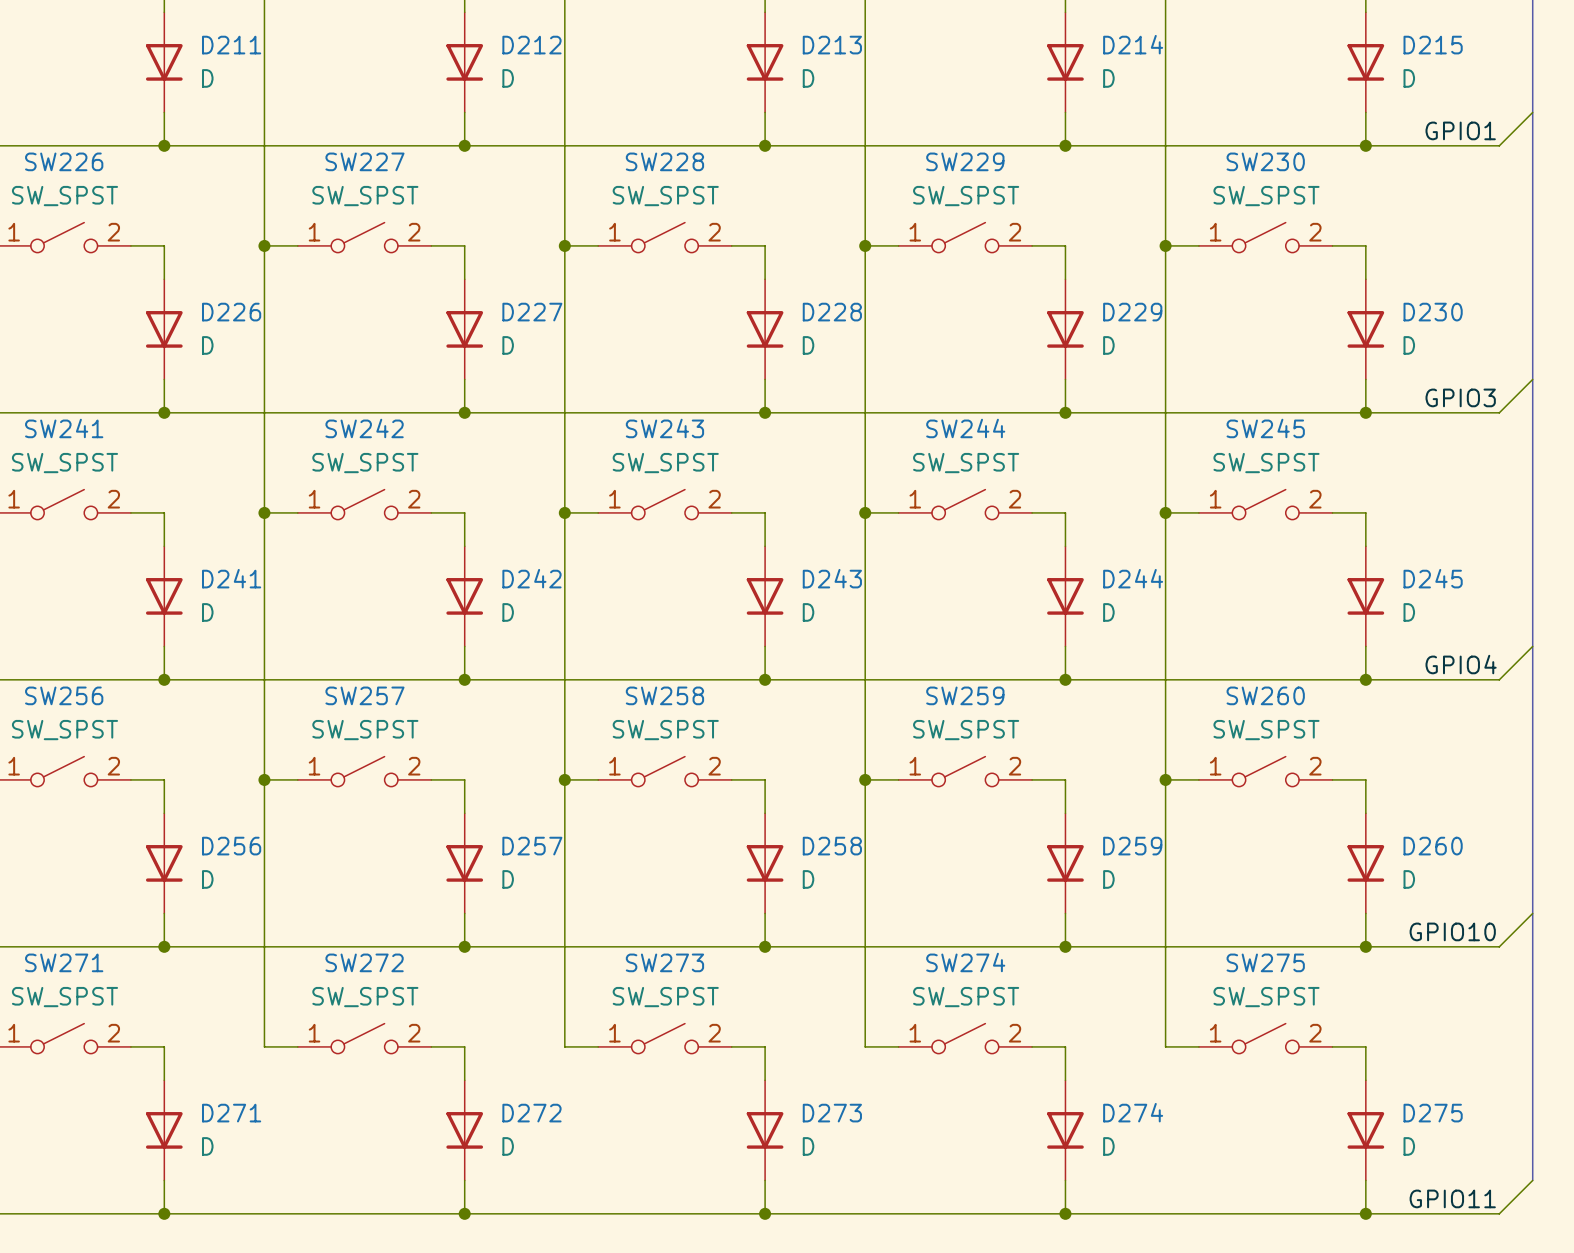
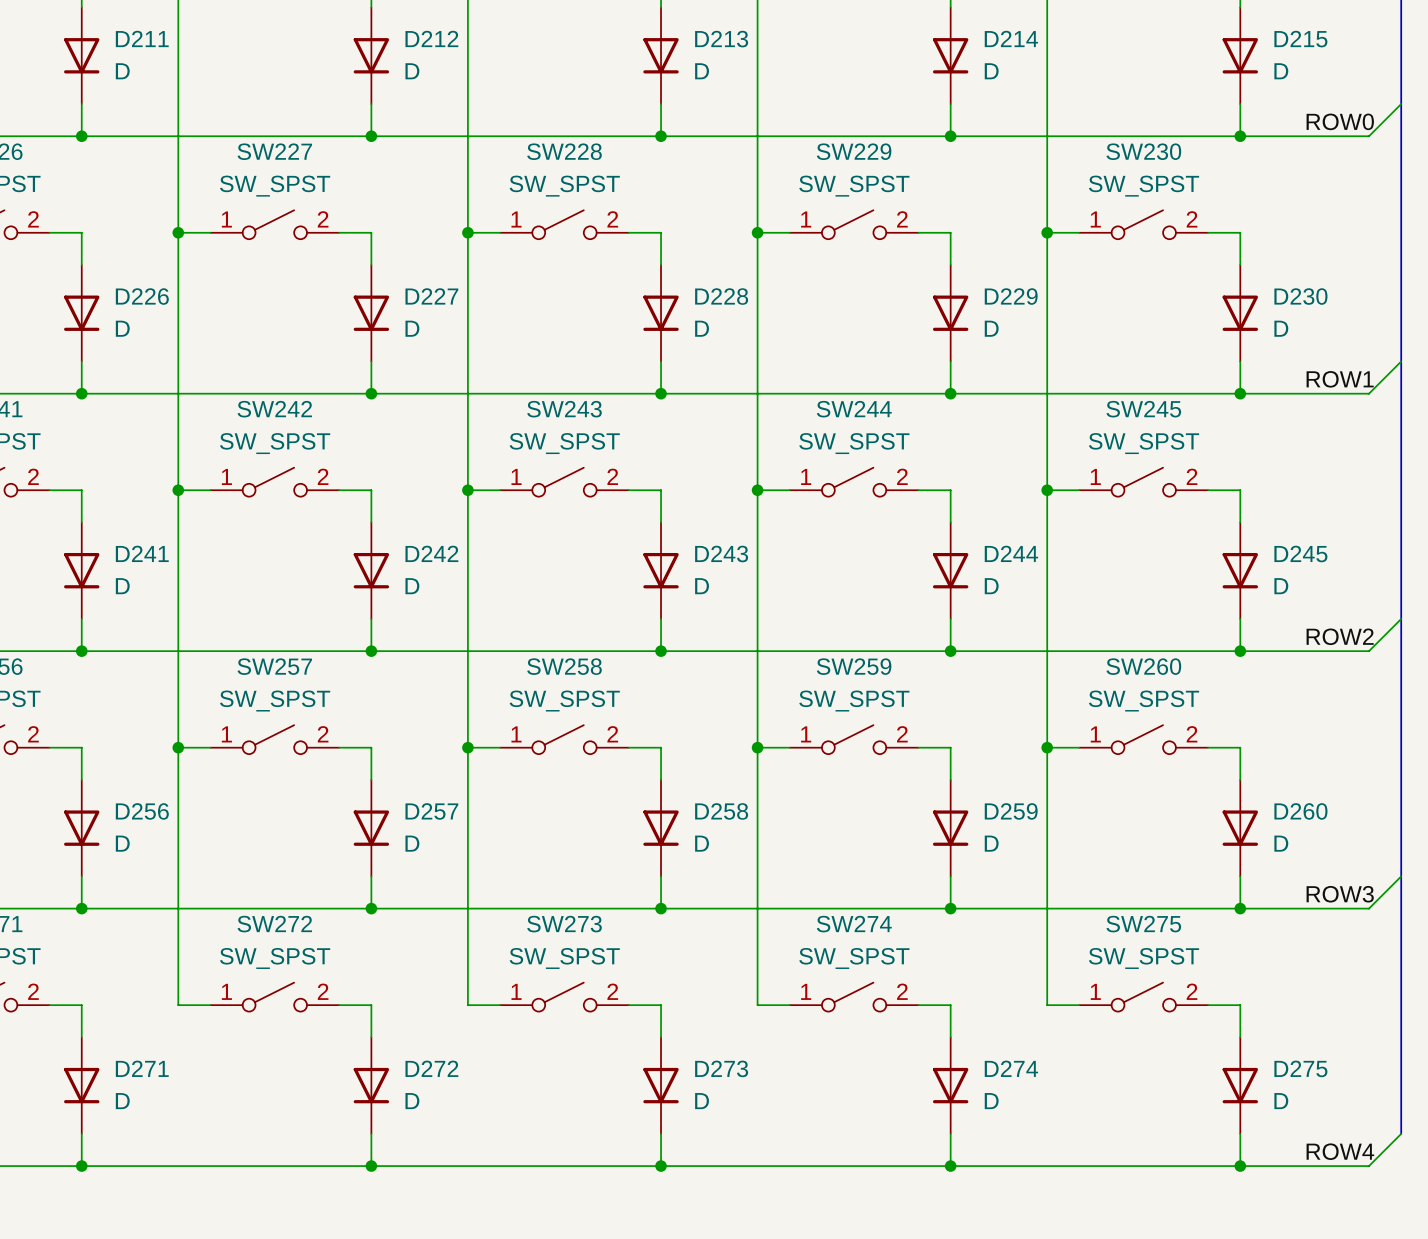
label: GPIO1 (1460, 130) -> none
label: none -> ROW0 (1340, 121)
label: GPIO3 (1460, 397) -> none
label: none -> ROW1 (1340, 379)
label: GPIO4 (1461, 664) -> none
label: none -> ROW2 (1340, 636)
label: GPIO10 (1452, 931) -> none
label: none -> ROW3 (1340, 894)
label: GPIO11 (1452, 1198) -> none
label: none -> ROW4 (1340, 1151)

